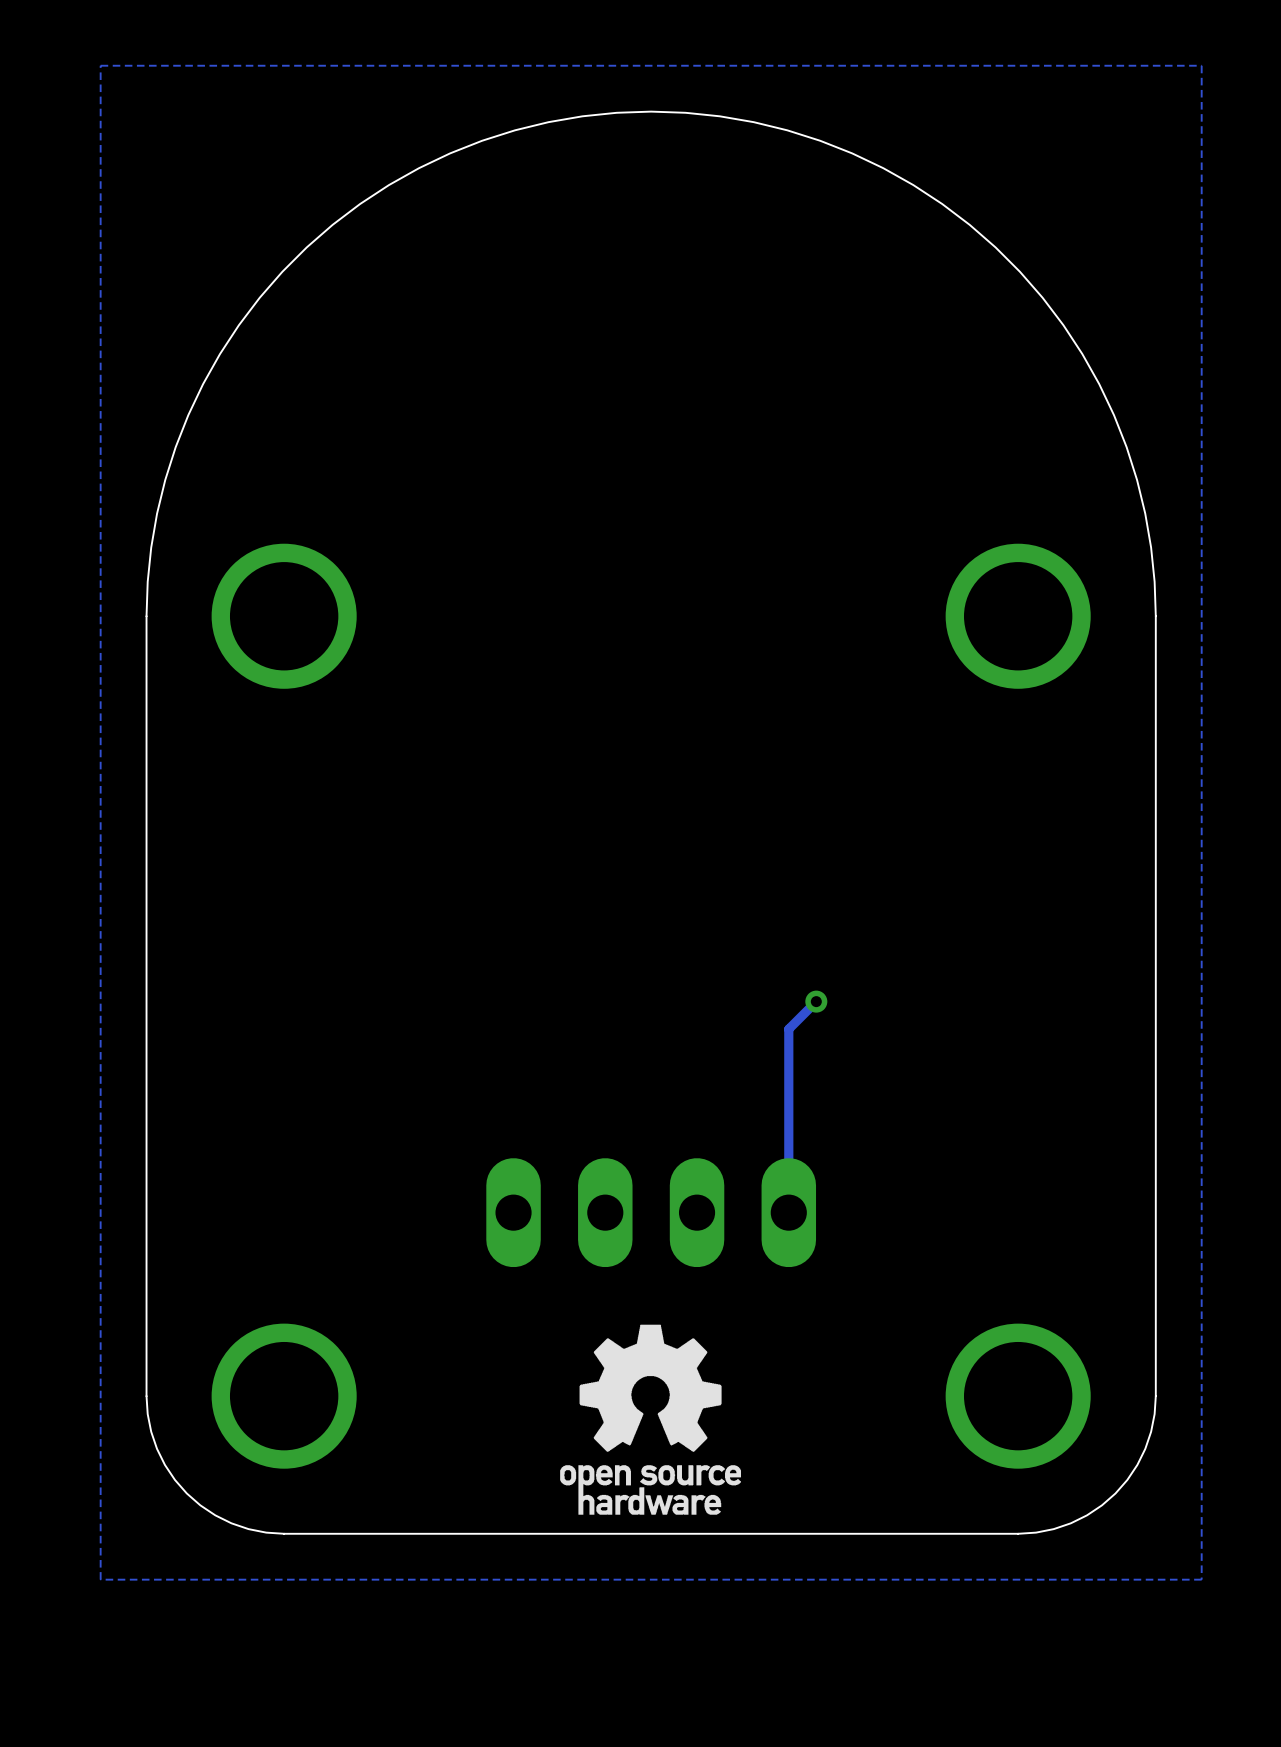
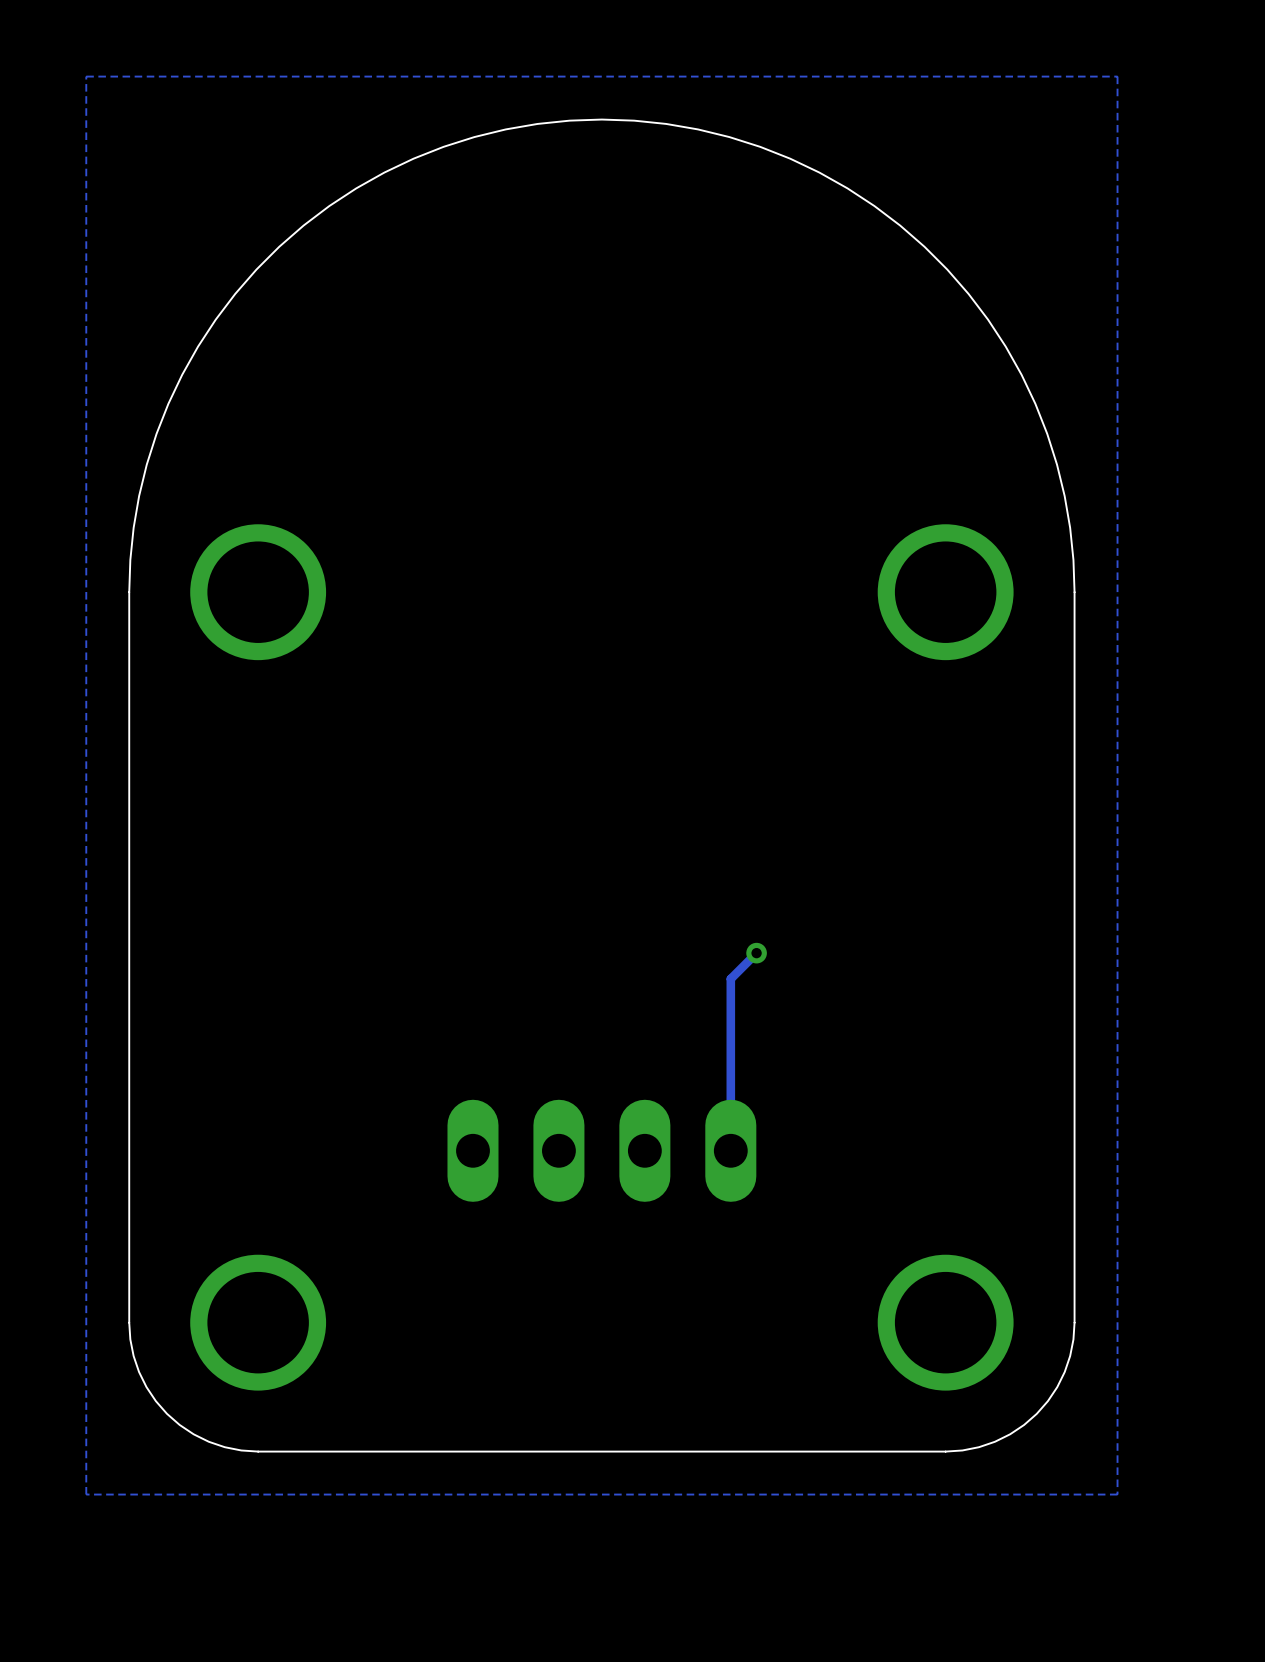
drawing: [560, 1324, 742, 1515] -> none

